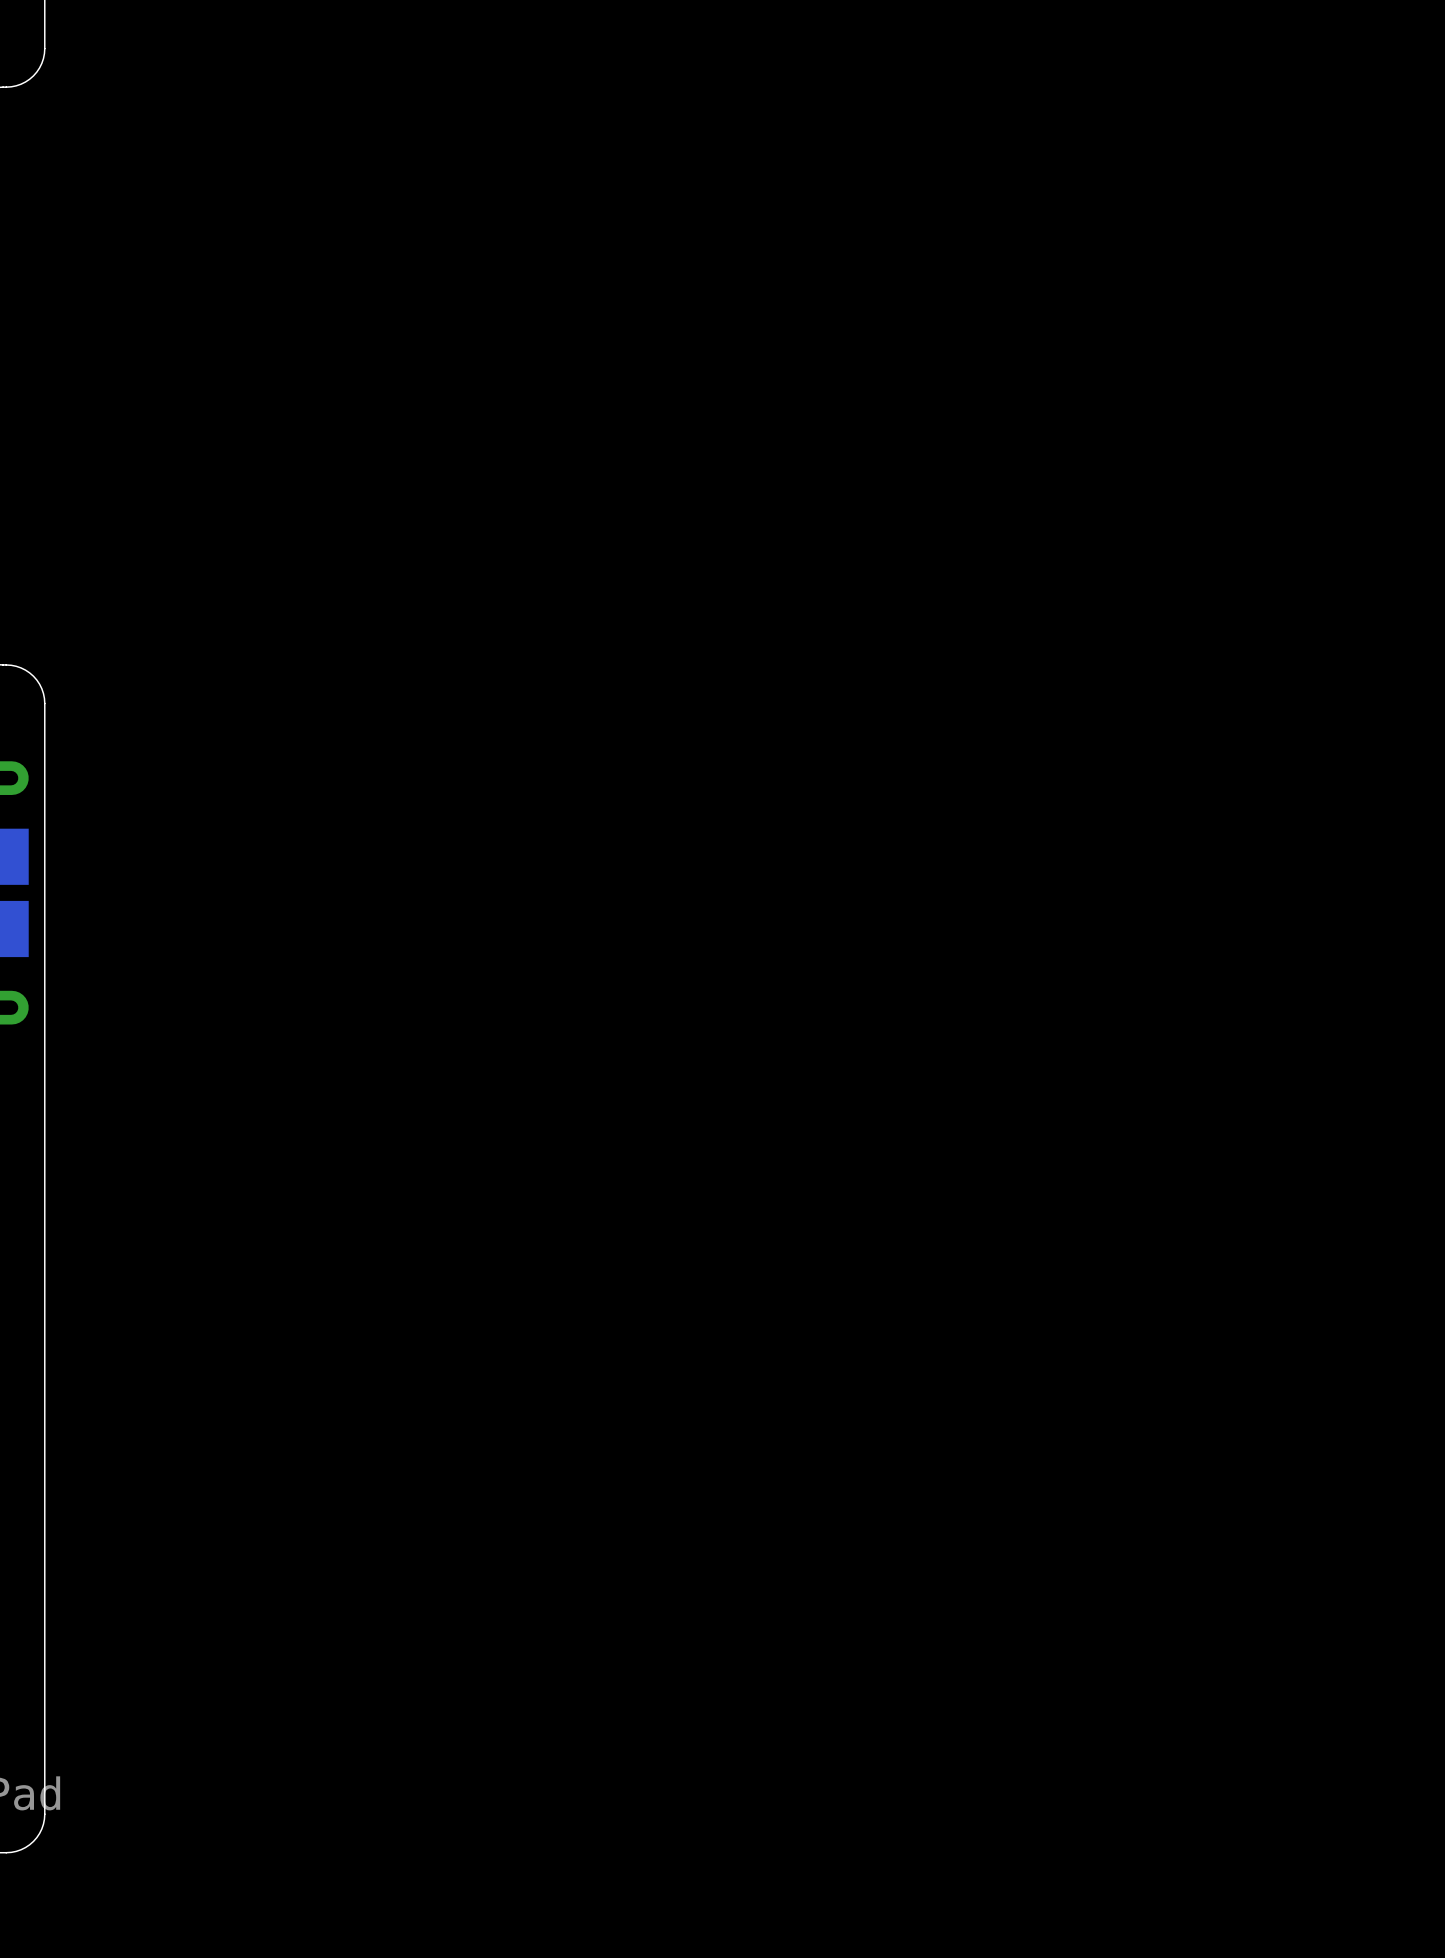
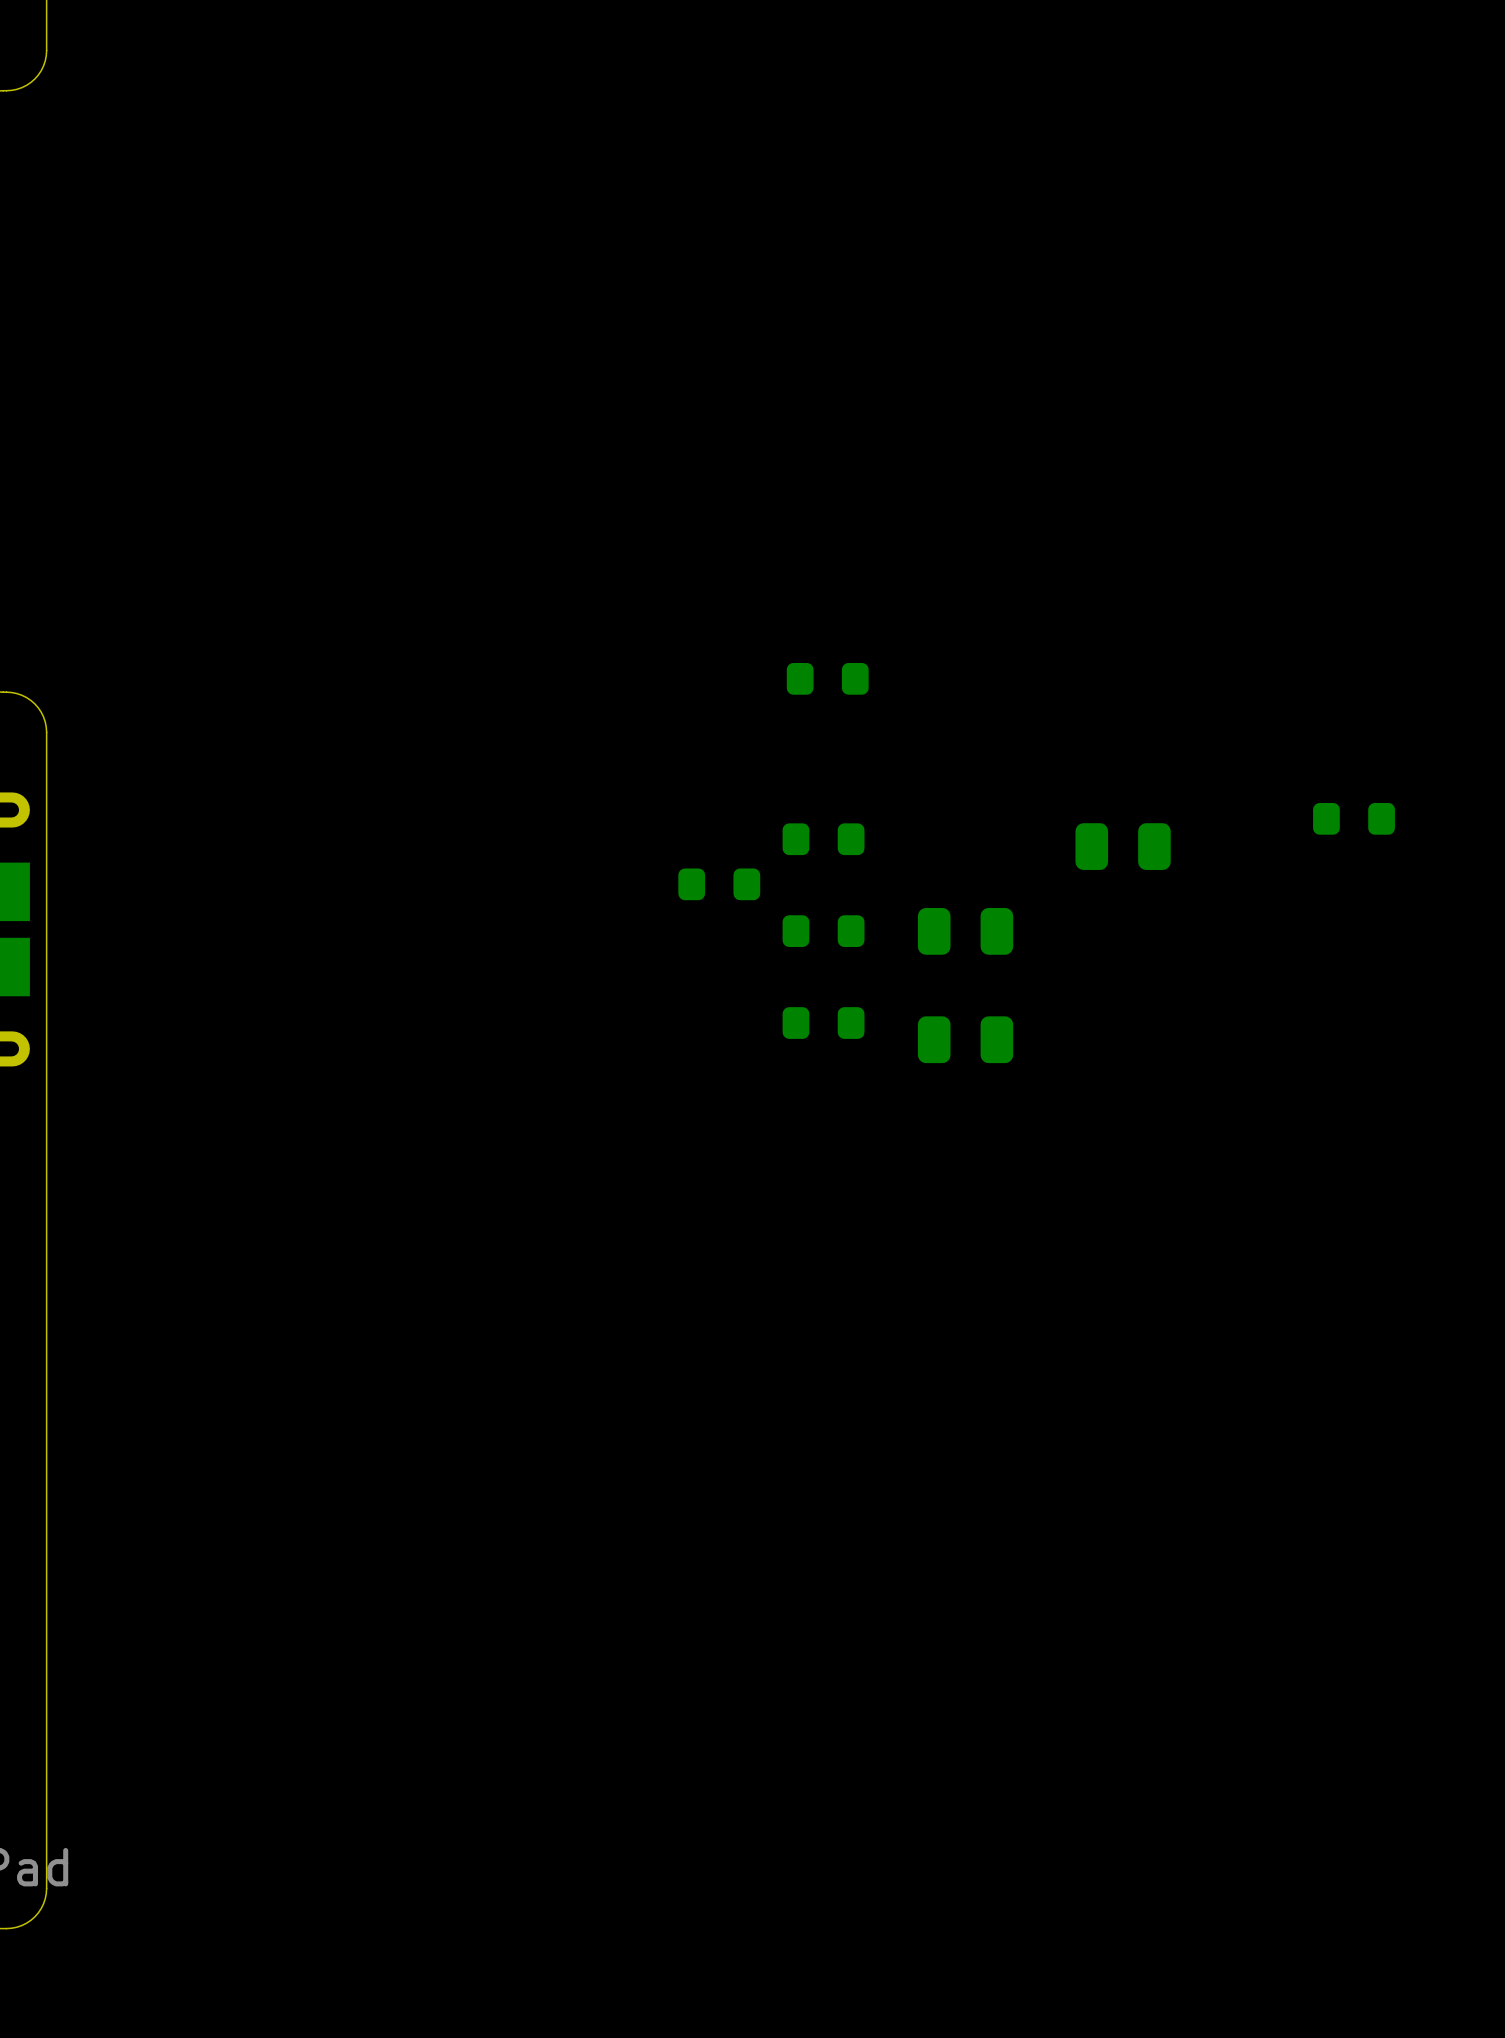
part: none -> (827, 678)
part: none -> (1354, 818)
part: none -> (823, 839)
part: none -> (1123, 846)
part: none -> (719, 884)
part: none -> (823, 931)
part: none -> (965, 931)
part: none -> (823, 1023)
part: none -> (965, 1039)

